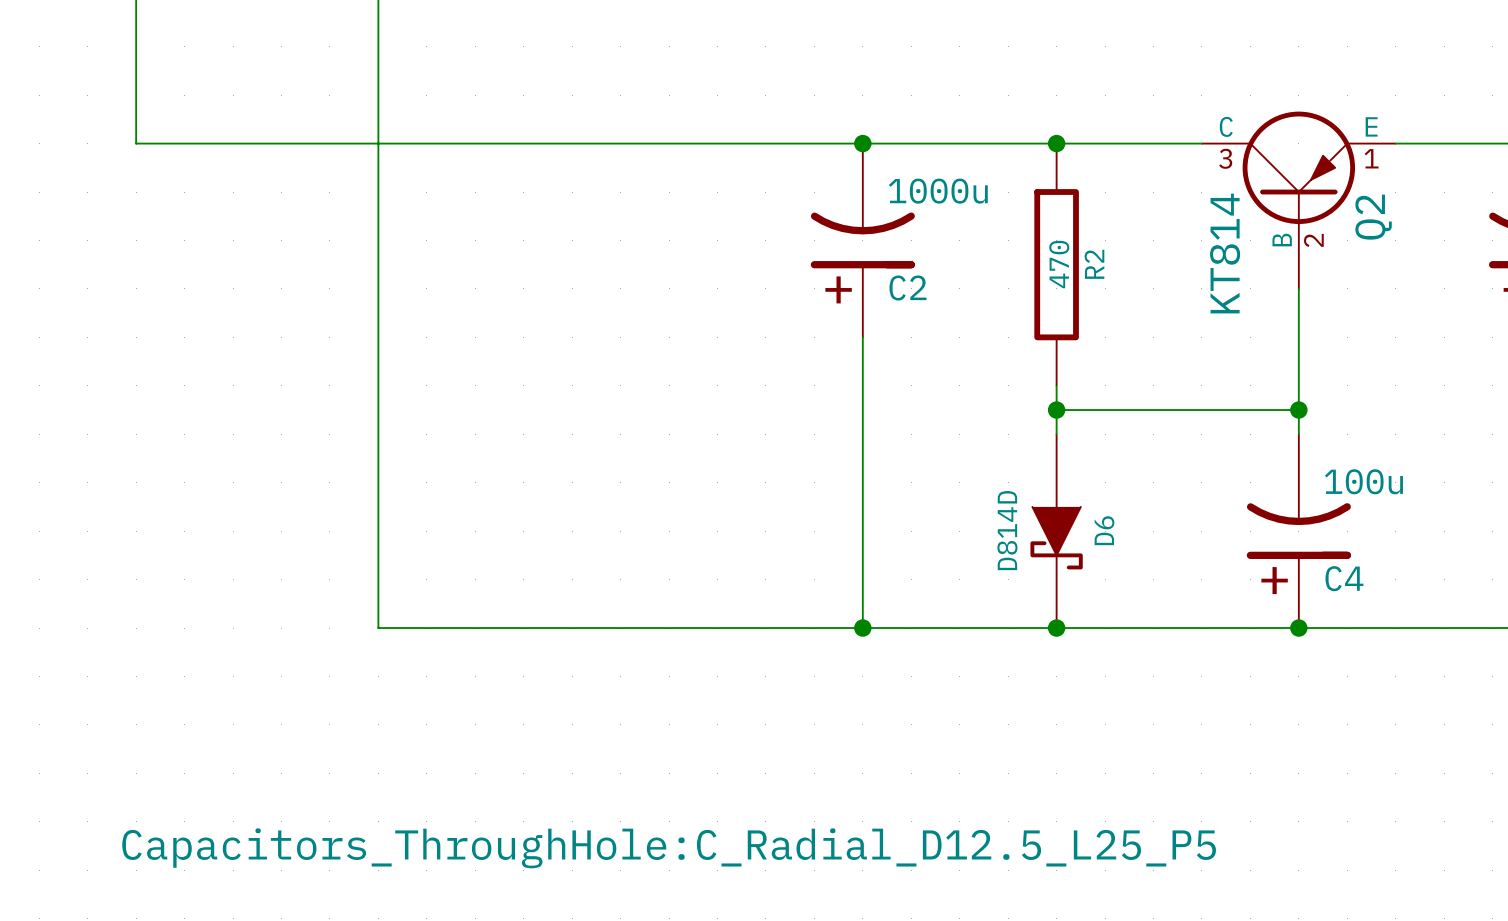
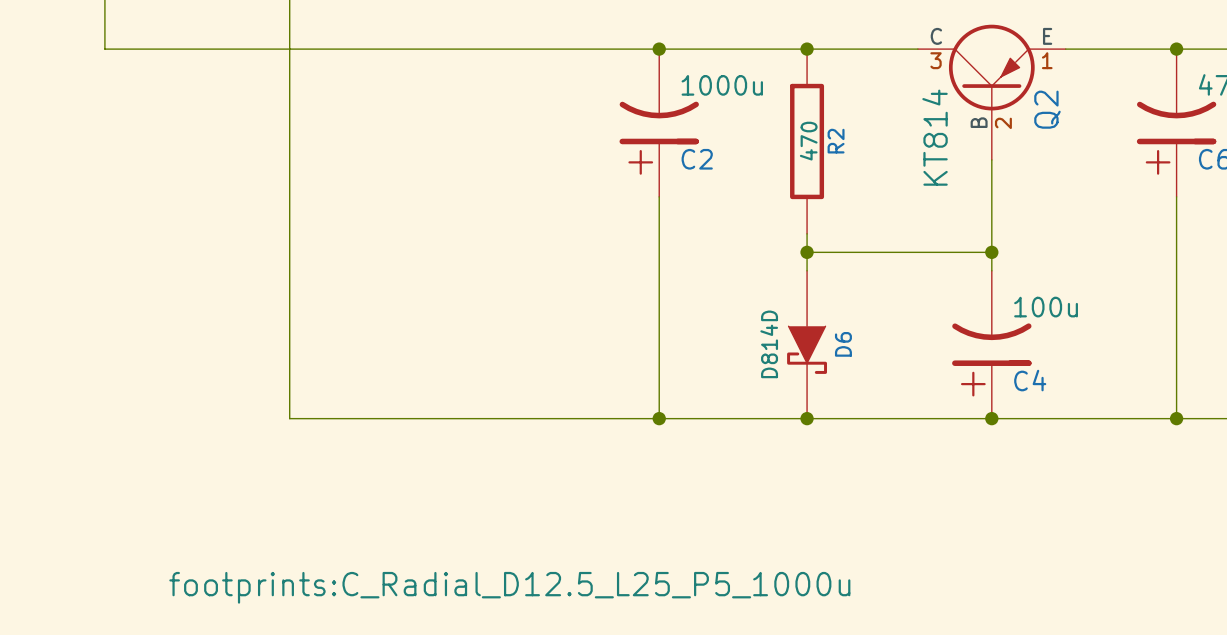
C2 text: Capacitors_ThroughHole:C_Radial_D12.5_L25_P5 (669, 848) -> footprints:C_Radial_D12.5_L25_P5_1000u (509, 587)

